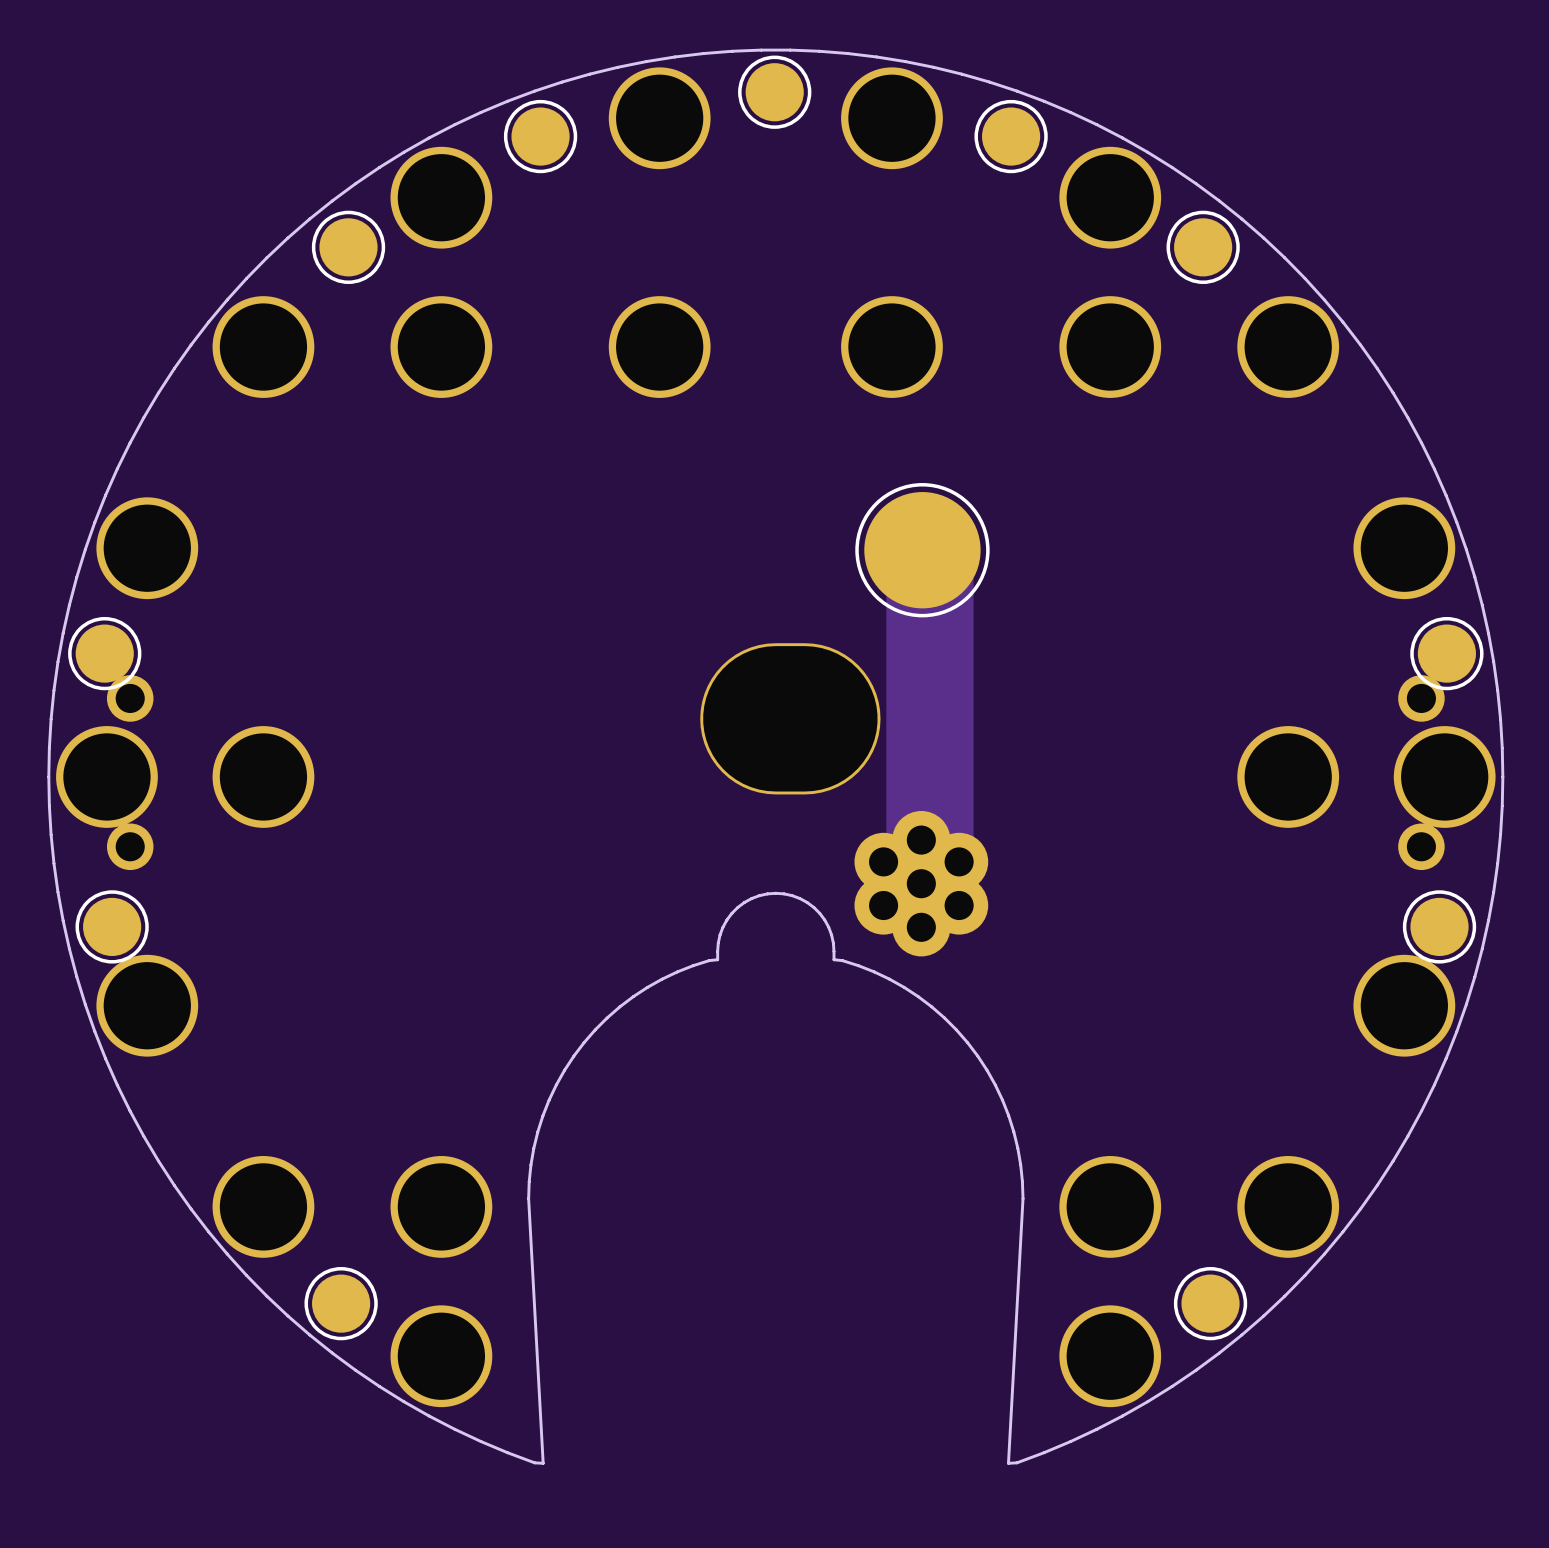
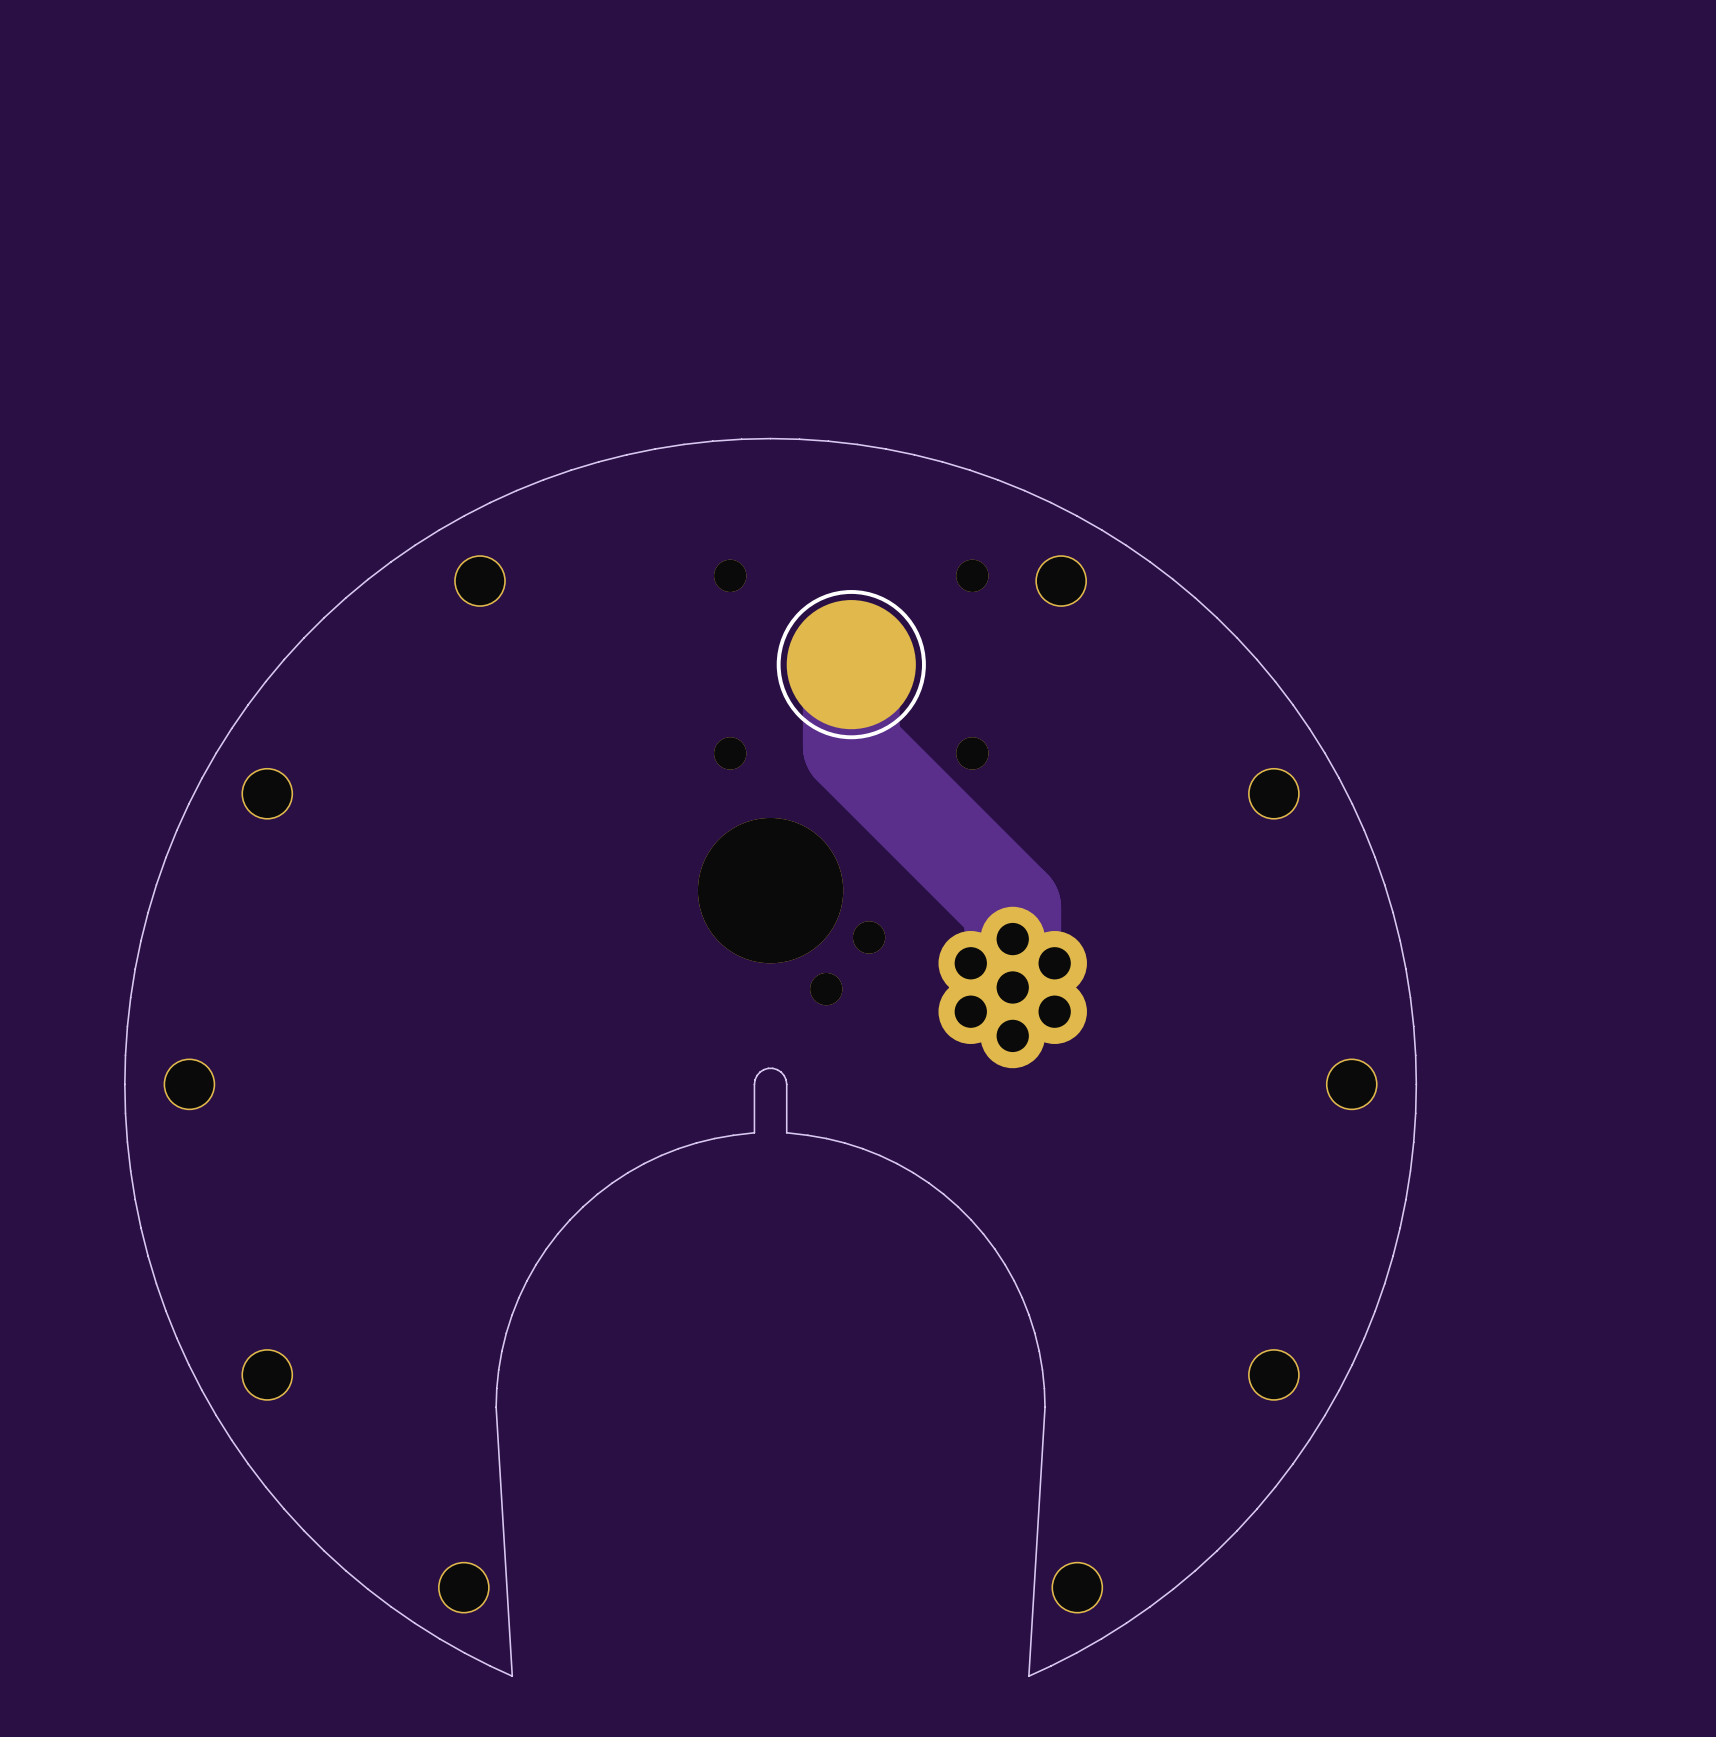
board edge: (790, 50) (703, 53) (646, 61) (589, 74) (534, 91) (481, 112) (429, 137) (355, 183) (309, 219) (266, 257) (208, 322) (174, 368) (143, 417) (117, 468) (85, 549) (69, 605) (57, 661) (51, 719) (48, 776) (51, 834) (63, 920) (76, 976) (94, 1031) (130, 1110) (158, 1161) (208, 1231) (246, 1275) (287, 1315) (332, 1353) (379, 1386) (429, 1416) (481, 1441) (534, 1462) (543, 1463) (528, 1198) (533, 1148) (542, 1115) (564, 1070) (595, 1029) (619, 1006) (647, 987) (693, 965) (717, 959) (718, 943) (722, 927) (731, 913) (744, 902) (759, 895) (775, 893) (792, 895) (813, 907) (828, 927) (833, 943) (833, 959) (858, 965) (889, 979) (931, 1006) (956, 1029) (977, 1056) (1002, 1100) (1017, 1148) (1023, 1198) (1008, 1463) (1016, 1462) (1044, 1452) (1096, 1429) (1172, 1386) (1219, 1353) (1263, 1315) (1324, 1254) (1377, 1185) (1407, 1136) (1434, 1084) (1466, 1004) (1482, 948) (1493, 892) (1502, 805) (1500, 719) (1493, 661) (1474, 577) (1456, 522) (1421, 443) (1377, 368) (1342, 322) (1284, 257) (1219, 200) (1172, 167) (1096, 124) (1044, 101) (961, 74) (876, 56) (790, 50) -> (770, 438) (828, 441) (885, 448) (970, 470) (1024, 490) (1076, 515) (1126, 545) (1173, 579) (1216, 617) (1256, 659) (1292, 704) (1324, 753) (1364, 830) (1384, 884) (1400, 940) (1413, 1026) (1416, 1084) (1413, 1142) (1405, 1199) (1393, 1256) (1375, 1311) (1352, 1364) (1324, 1415) (1292, 1463) (1256, 1509) (1216, 1551) (1173, 1589) (1126, 1623) (1076, 1652) (1028, 1676) (1045, 1407) (1039, 1351) (1022, 1297) (1005, 1264) (983, 1234) (957, 1206) (928, 1183) (896, 1163) (862, 1148) (826, 1138) (786, 1132) (786, 1079) (777, 1069) (763, 1069) (755, 1079) (754, 1132) (714, 1138) (678, 1148) (644, 1163) (612, 1183) (583, 1206) (557, 1234) (536, 1264) (518, 1297) (501, 1351) (496, 1407) (512, 1676) (439, 1638) (367, 1589) (324, 1551) (265, 1486) (216, 1415) (188, 1364) (156, 1283) (141, 1228) (127, 1142) (124, 1084) (127, 1026) (141, 940) (156, 884) (188, 804) (216, 753) (265, 681) (324, 617) (367, 579) (439, 530) (490, 502) (571, 470) (626, 454) (712, 441) (770, 438)
part: (774, 92) -> none
part: (659, 118) -> none
part: (891, 118) -> none
part: (540, 136) -> none
part: (1011, 136) -> none
part: (441, 197) -> none
part: (1110, 197) -> none
part: (348, 247) -> none
part: (1203, 247) -> none
part: (263, 347) -> none
part: (441, 347) -> none
part: (659, 347) -> none
part: (891, 347) -> none
part: (1110, 347) -> none
part: (1288, 347) -> none
part: none -> (730, 575)
part: none -> (972, 575)
part: none -> (479, 581)
part: none -> (1061, 581)
part: (147, 548) -> none
part: (1404, 548) -> none
track: (922, 550) (929, 557) (929, 875) (921, 883) -> none
part position: (922, 550) -> (851, 664)
track: none -> (851, 664) (851, 746) (1012, 907) (1012, 939)
part: (104, 653) -> none
part: (1446, 653) -> none
part: none -> (730, 753)
part: none -> (972, 753)
part: (130, 698) -> none
part: (1421, 698) -> none
part: none -> (267, 793)
part: none -> (1273, 793)
part: (790, 718) -> none
part: (106, 776) -> none
part: (263, 776) -> none
part: (1288, 776) -> none
part: (1444, 776) -> none
part: none -> (770, 890)
part: none -> (869, 937)
part: (130, 846) -> none
part: (1421, 846) -> none
part: none -> (826, 989)
part: (112, 926) -> none
part: (1439, 926) -> none
part: none -> (189, 1084)
part: none -> (1351, 1084)
part: (147, 1005) -> none
part: (1404, 1005) -> none
part: (263, 1206) -> none
part: (441, 1206) -> none
part: (1110, 1206) -> none
part: (1288, 1206) -> none
part: none -> (267, 1374)
part: none -> (1273, 1374)
part: (341, 1303) -> none
part: (1210, 1303) -> none
part: (441, 1356) -> none
part: (1110, 1356) -> none
part: none -> (463, 1587)
part: none -> (1077, 1587)

